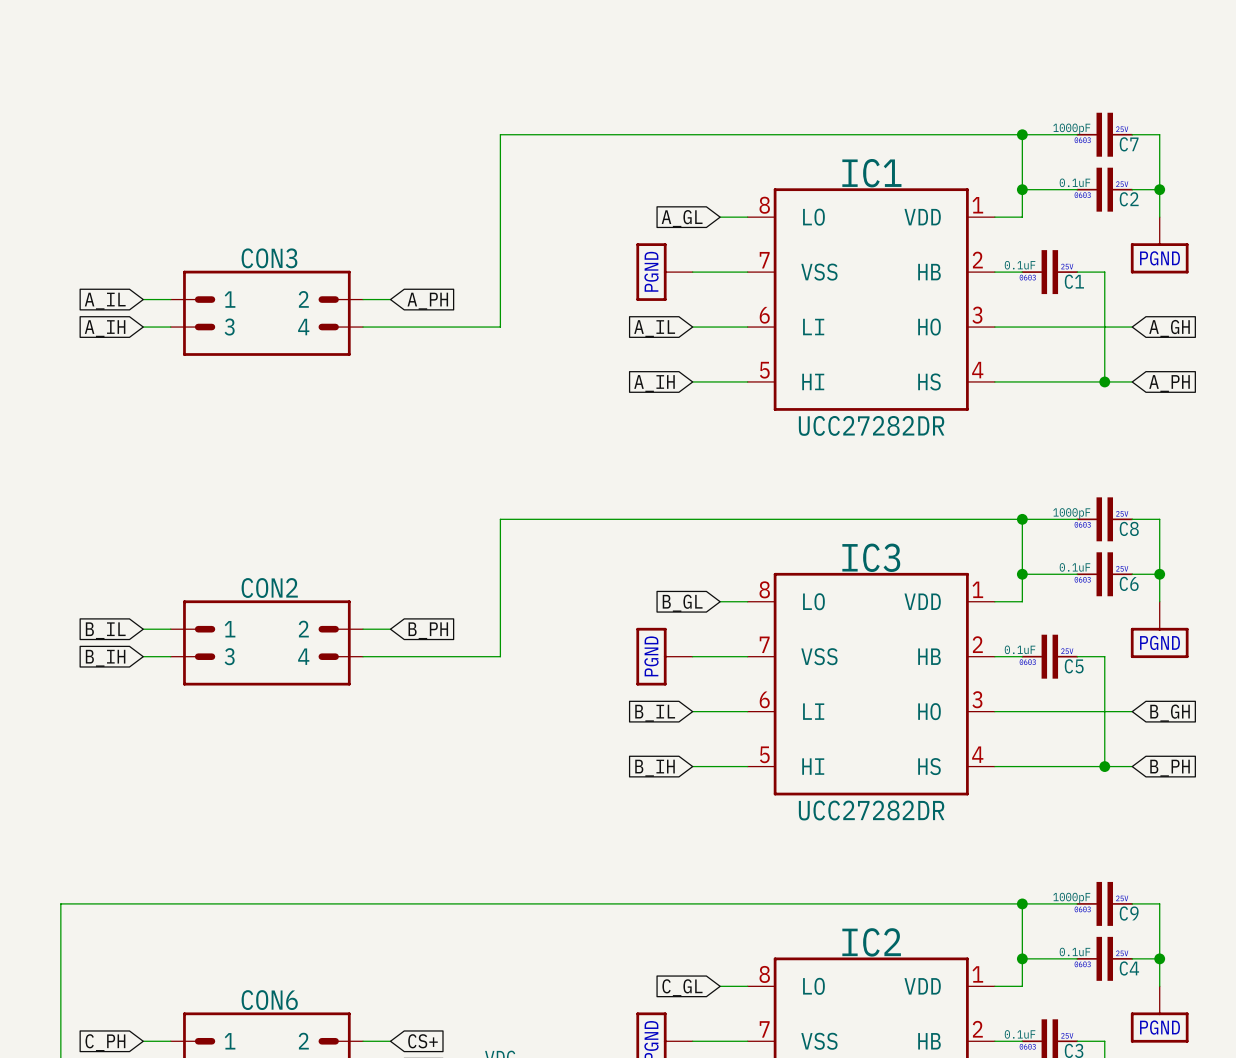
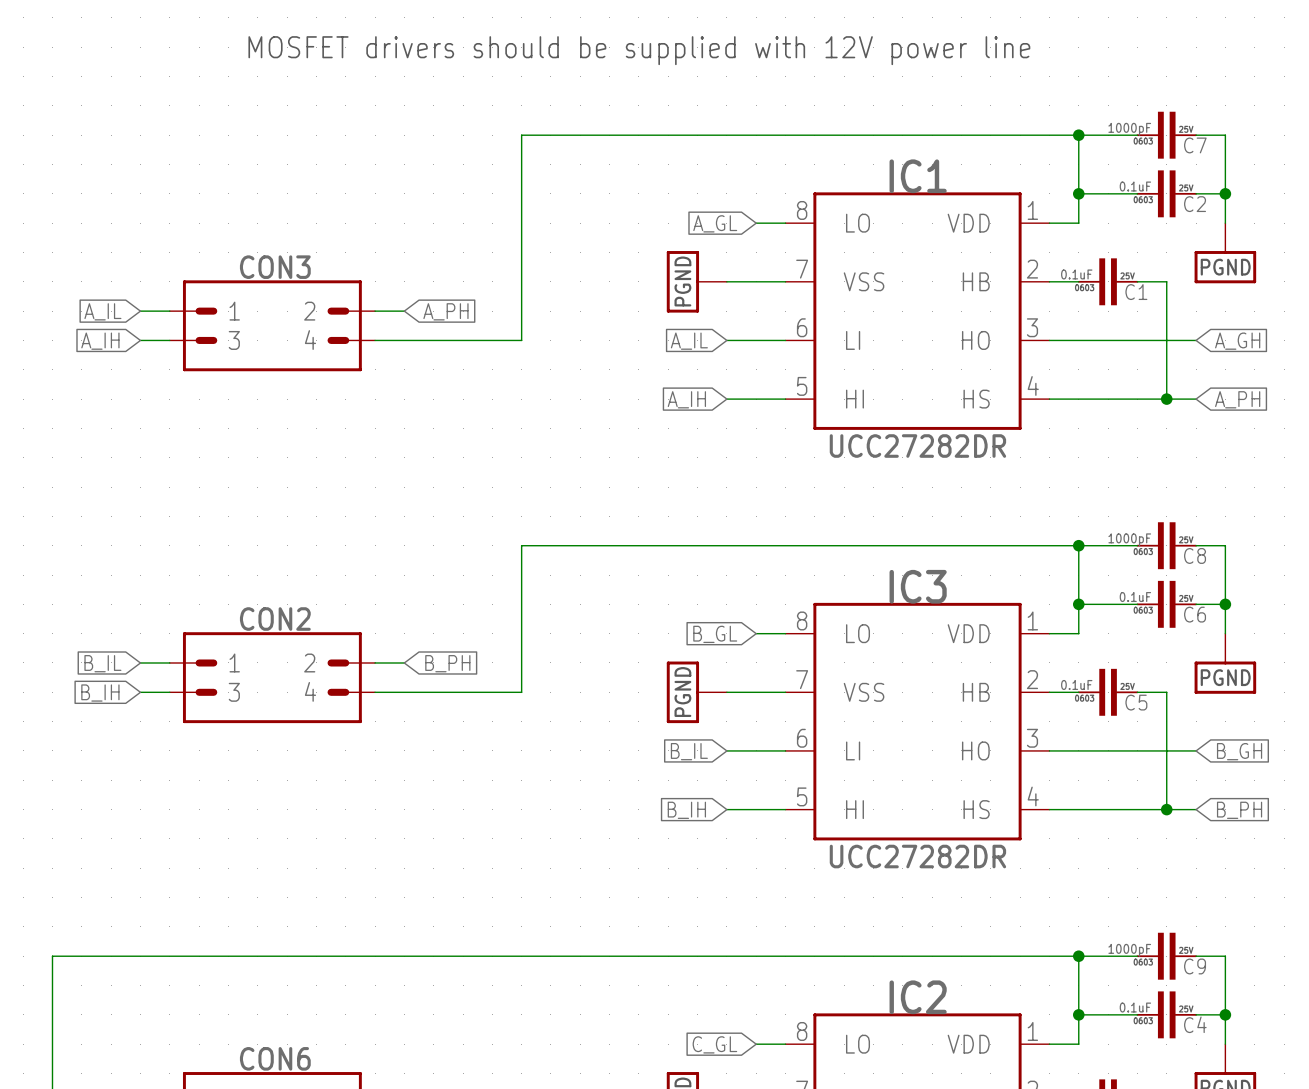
text: none -> MOSFET drivers should be supplied with 12V power line (639, 50)

